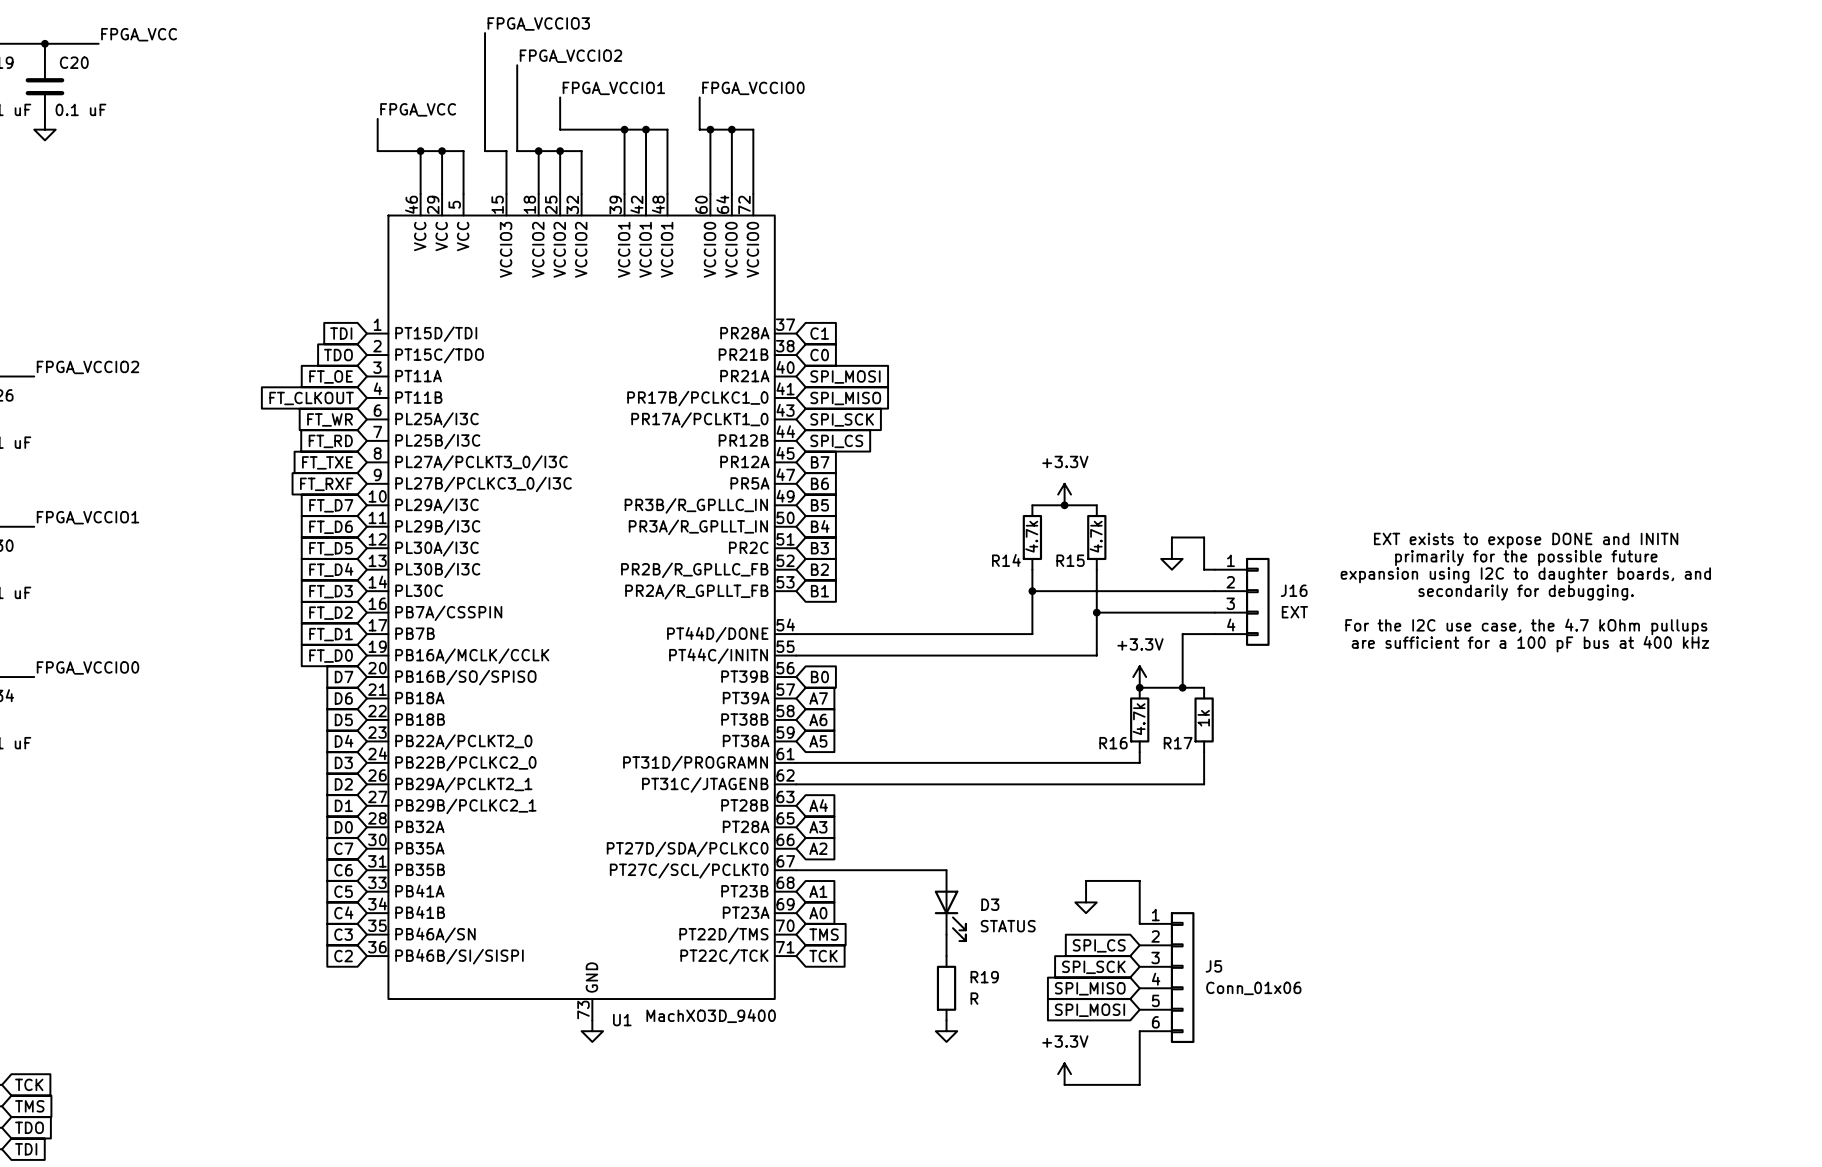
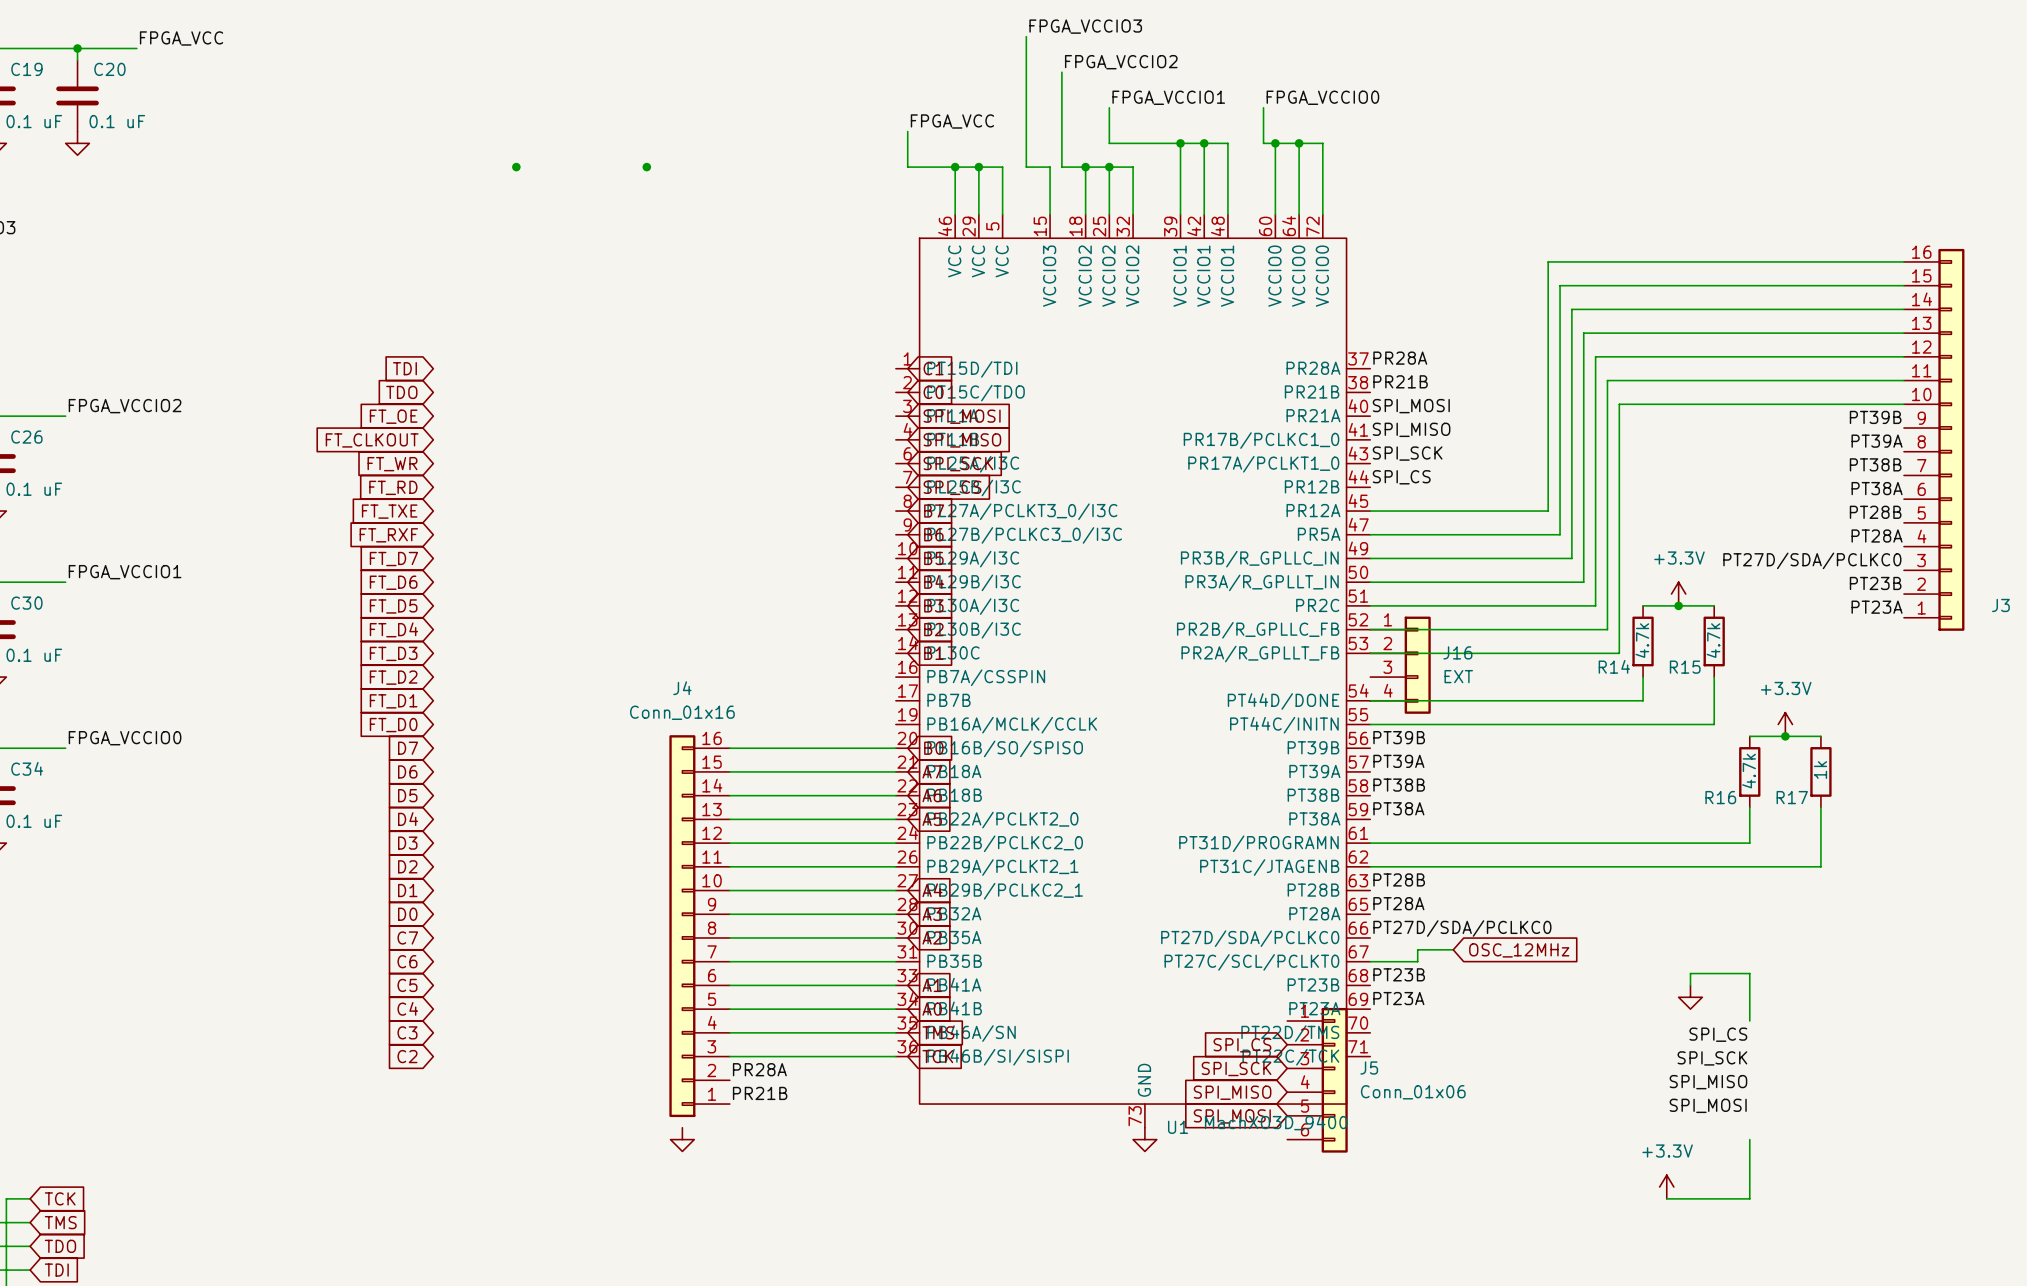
label: FPGA_VCCIO3 (538, 23) -> none
label: none -> FPGA_VCCIO3 (1085, 26)
wire: (485, 33) (485, 151) (506, 151) (506, 194) -> none
wire: none -> (1026, 36) (1026, 167) (1050, 167) (1050, 214)
label: FPGA_VCCIO2 (570, 56) -> none
label: none -> FPGA_VCCIO2 (1121, 62)
wire: (517, 65) (517, 151) (581, 151) (581, 194) -> none
wire: none -> (1061, 72) (1061, 167) (1133, 167) (1133, 214)
label: FPGA_VCCIO1 (613, 88) -> none
label: FPGA_VCCIO0 (753, 88) -> FPGA_VCC (952, 121)
label: none -> FPGA_VCCIO1 (1168, 97)
label: none -> FPGA_VCCIO0 (1322, 97)
wire: (560, 97) (560, 129) (667, 129) (667, 194) -> none
wire: (699, 97) (699, 129) (753, 129) (753, 194) -> none
wire: none -> (1109, 107) (1109, 143) (1227, 143) (1227, 214)
wire: none -> (1263, 107) (1263, 143) (1322, 143) (1322, 214)
label: FPGA_VCC (418, 109) -> none
wire: (377, 118) (377, 151) (463, 151) (463, 194) -> none
wire: none -> (907, 131) (907, 167) (1002, 167) (1002, 214)
wire: (624, 129) (624, 194) -> none
junction: (624, 129) -> none
wire: (646, 129) (646, 194) -> none
junction: (646, 129) -> none
wire: (710, 129) (710, 194) -> none
junction: (710, 129) -> none
wire: (731, 129) (731, 194) -> none
junction: (731, 129) -> none
wire: none -> (1180, 143) (1180, 214)
junction: none -> (1180, 143)
wire: none -> (1204, 143) (1204, 214)
junction: none -> (1204, 143)
wire: none -> (1275, 143) (1275, 214)
junction: none -> (1275, 143)
wire: none -> (1299, 143) (1299, 214)
junction: none -> (1299, 143)
wire: (420, 151) (420, 194) -> none
junction: (420, 151) -> none
wire: (442, 151) (442, 194) -> none
wire: (538, 151) (538, 194) -> none
junction: (538, 151) -> none
wire: (560, 151) (560, 194) -> none
wire: none -> (955, 167) (955, 214)
junction: none -> (955, 167)
wire: none -> (978, 167) (978, 214)
junction: none -> (978, 167)
wire: none -> (1085, 167) (1085, 214)
junction: none -> (1085, 167)
wire: none -> (1109, 167) (1109, 214)
junction: none -> (1109, 167)
wire: none -> (1903, 261) (1548, 261) (1548, 511) (1370, 511)
wire: none -> (1903, 285) (1560, 285) (1560, 534) (1370, 534)
wire: none -> (1903, 309) (1571, 309) (1571, 558) (1370, 558)
wire: none -> (1903, 333) (1583, 333) (1583, 582) (1370, 582)
wire: none -> (1903, 356) (1595, 356) (1595, 605) (1370, 605)
label: none -> PR28A (1400, 358)
label: none -> PR21B (1400, 381)
label: none -> SPI_MOSI (1411, 406)
label: none -> PT39B (1875, 417)
label: none -> SPI_MISO (1411, 429)
J3: none -> (1934, 439)
label: none -> PT39A (1877, 441)
label: none -> SPI_SCK (1407, 453)
label: none -> PT38B (1875, 464)
label: none -> SPI_CS (1401, 477)
label: none -> PT38A (1877, 488)
label: none -> PT28B (1875, 512)
label: none -> PT28A (1877, 536)
power symbol: +3.3V (1064, 494) -> none
wire: (1032, 505) (1096, 505) -> none
junction: (1064, 505) -> none
label: none -> PT27D/SDA/PCLKC0 (1812, 560)
label: none -> PT23B (1875, 583)
R14 position: (1032, 537) -> (1643, 641)
R15 position: (1096, 537) -> (1714, 641)
power symbol: none -> +3.3V (1678, 594)
text: EXT exists to expose DONE and INITN (1526, 540) -> none
wire: (1171, 548) (1171, 537) (1204, 537) (1204, 569) (1214, 569) -> (1903, 380) (1607, 380) (1607, 629) (1370, 629)
wire: none -> (1643, 605) (1714, 605)
junction: none -> (1678, 605)
label: none -> PT23A (1877, 607)
power symbol: (1171, 558) -> none
text: primarily for the possible future (1526, 558) -> none
wire: (1032, 569) (1032, 634) (796, 634) -> none
wire: (1096, 569) (1096, 655) (796, 655) -> none
text: expansion using I2C to daughter boards, and (1525, 575) -> none
wire: (1032, 591) (1214, 591) -> (1903, 404) (1619, 404) (1619, 653) (1370, 653)
junction: (1032, 591) -> none
text: secondarily for debugging. (1526, 592) -> none
U1 position: (581, 607) -> (1133, 671)
wire: (1096, 612) (1214, 612) -> none
junction: (1096, 612) -> none
wire: none -> (1714, 677) (1714, 724) (1370, 724)
text: For the I2C use case, the 4.7 kOhm pullups (1526, 626) -> none
wire: (1214, 634) (1182, 634) (1182, 687) -> (1370, 700) (1643, 700) (1643, 677)
text: are sufficient for a 100 pF bus at 400 kHz (1530, 644) -> none
power symbol: none -> +3.3V (1785, 724)
wire: none -> (1749, 736) (1820, 736)
junction: none -> (1785, 736)
label: none -> PT39B (1399, 737)
wire: none -> (729, 748) (895, 748)
power symbol: +3.3V (1139, 677) -> none
wire: (1139, 687) (1204, 687) -> none
junction: (1139, 687) -> none
junction: (1182, 687) -> none
label: none -> PT39A (1398, 761)
wire: none -> (729, 771) (895, 771)
label: none -> PT38B (1399, 785)
wire: none -> (729, 795) (895, 795)
R16 position: (1139, 719) -> (1749, 771)
R17 position: (1204, 719) -> (1820, 771)
wire: none -> (1749, 807) (1749, 843) (1370, 843)
wire: none -> (1820, 807) (1820, 866) (1370, 866)
label: none -> PT38A (1398, 808)
wire: none -> (729, 819) (895, 819)
wire: (1139, 752) (1139, 762) (796, 762) -> none
wire: (1204, 752) (1204, 784) (796, 784) -> none
wire: none -> (729, 843) (895, 843)
wire: none -> (729, 866) (895, 866)
label: none -> PT28B (1399, 879)
wire: none -> (729, 890) (895, 890)
label: none -> PT28A (1398, 903)
wire: none -> (729, 914) (895, 914)
J4: none -> Conn_01x16 (699, 926)
label: none -> PT27D/SDA/PCLKC0 (1462, 928)
wire: none -> (729, 937) (895, 937)
wire: none -> (1453, 949) (1417, 949) (1417, 961) (1370, 961)
global label: none -> OSC_12MHz (1519, 950)
wire: (796, 870) (946, 870) -> (729, 961) (895, 961)
label: none -> PT23B (1399, 974)
wire: none -> (729, 985) (895, 985)
wire: (1086, 891) (1086, 880) (1139, 880) (1139, 923) -> none
wire: none -> (1690, 985) (1690, 973) (1749, 973) (1749, 1021)
power symbol: (1086, 902) -> none
power symbol: none -> (1690, 997)
label: none -> PT23A (1398, 998)
D3: STATUS (950, 905) -> none
wire: none -> (729, 1009) (895, 1009)
wire: none -> (729, 1032) (895, 1032)
wire: (946, 934) (946, 956) -> none
label: none -> SPI_CS (1718, 1034)
wire: none -> (729, 1056) (895, 1056)
label: none -> SPI_SCK (1712, 1058)
label: none -> PR28A (759, 1069)
label: none -> SPI_MISO (1708, 1082)
R19: R (946, 988) -> none
label: none -> PR21B (760, 1093)
label: none -> SPI_MOSI (1708, 1105)
power symbol position: (946, 1031) -> (1144, 1139)
wire: (1139, 1031) (1139, 1084) (1064, 1084) -> none
wire: none -> (1749, 1139) (1749, 1198) (1666, 1198)
power symbol: +3.3V (1064, 1074) -> none
power symbol: none -> +3.3V (1666, 1187)

